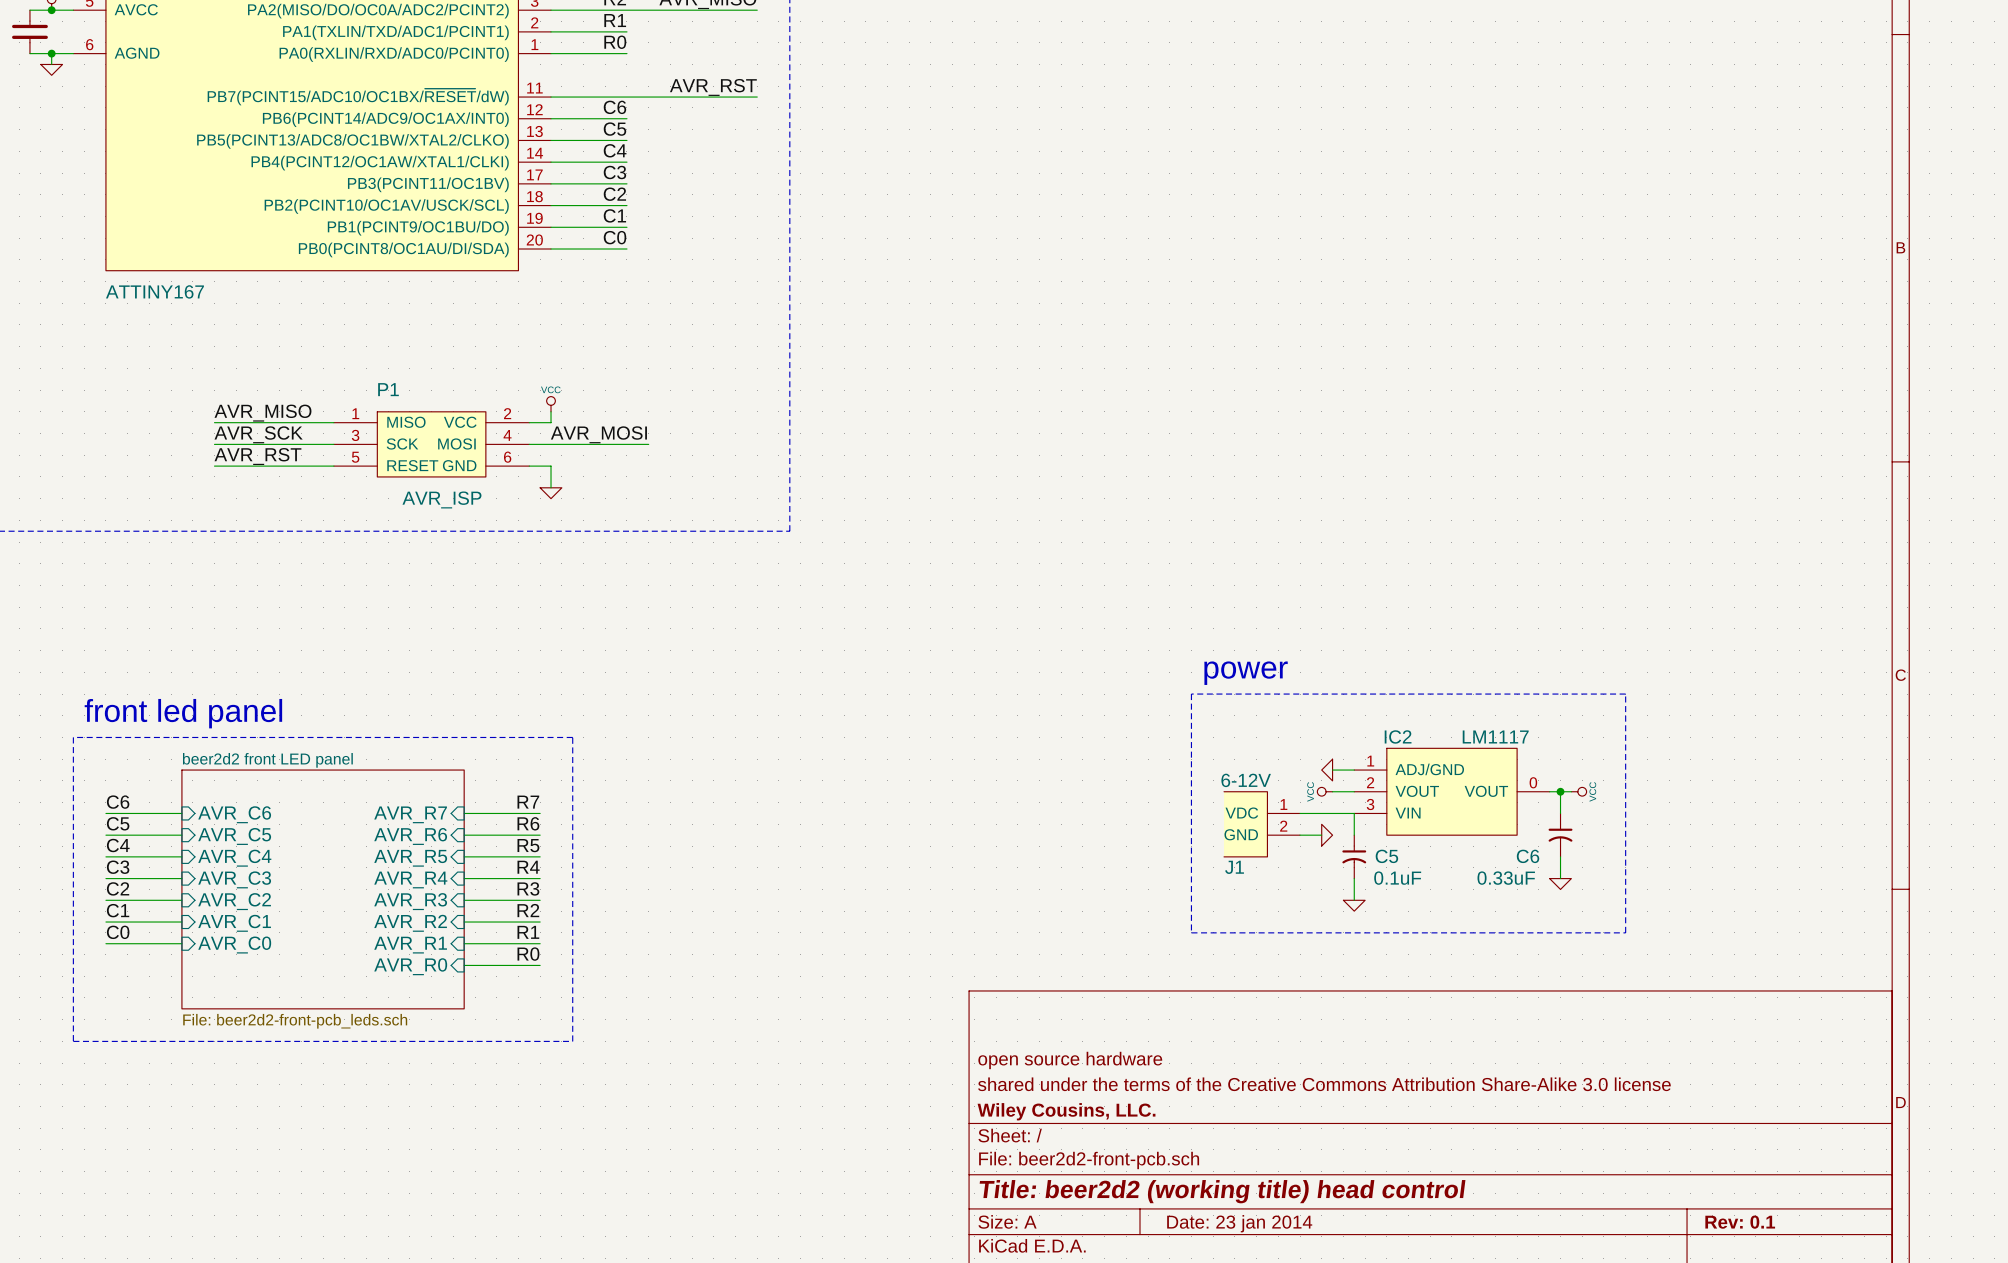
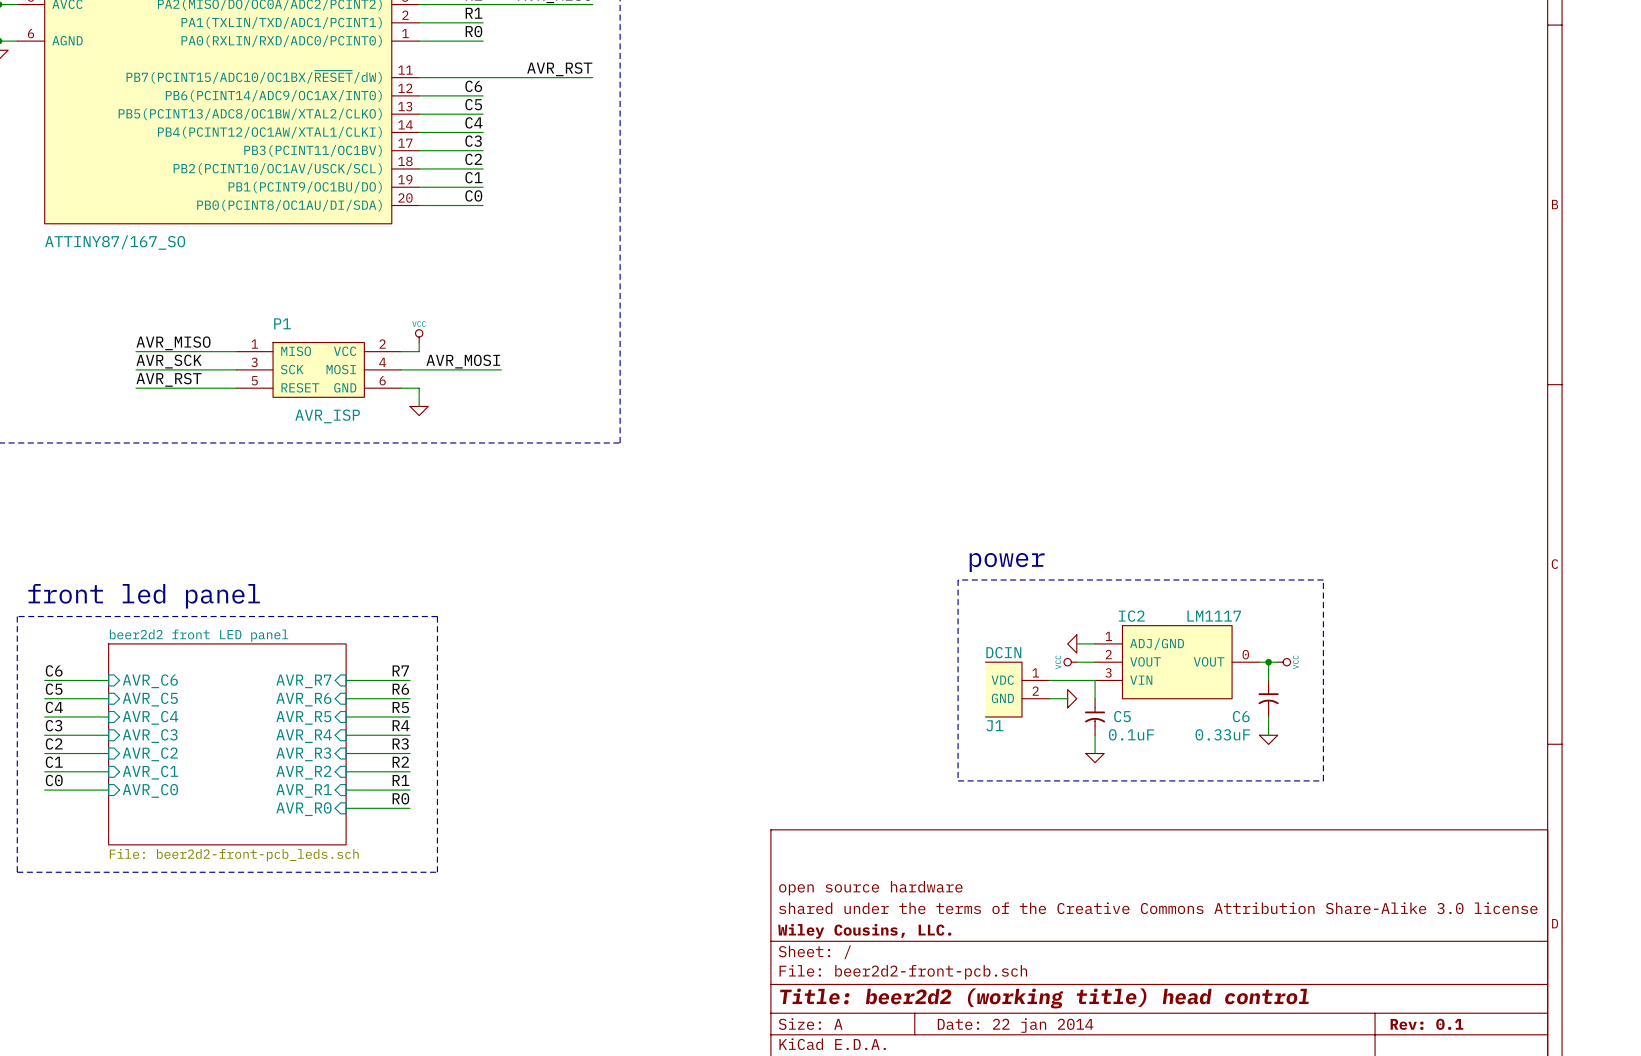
part value: ATTINY167 (154, 291) -> ATTINY87/167_SO (115, 242)
J1 value: 6-12V (1246, 780) -> DCIN (1003, 652)
title block: Date: 23 jan 2014 (1239, 1223) -> Date: 22 jan 2014 (1015, 1025)

